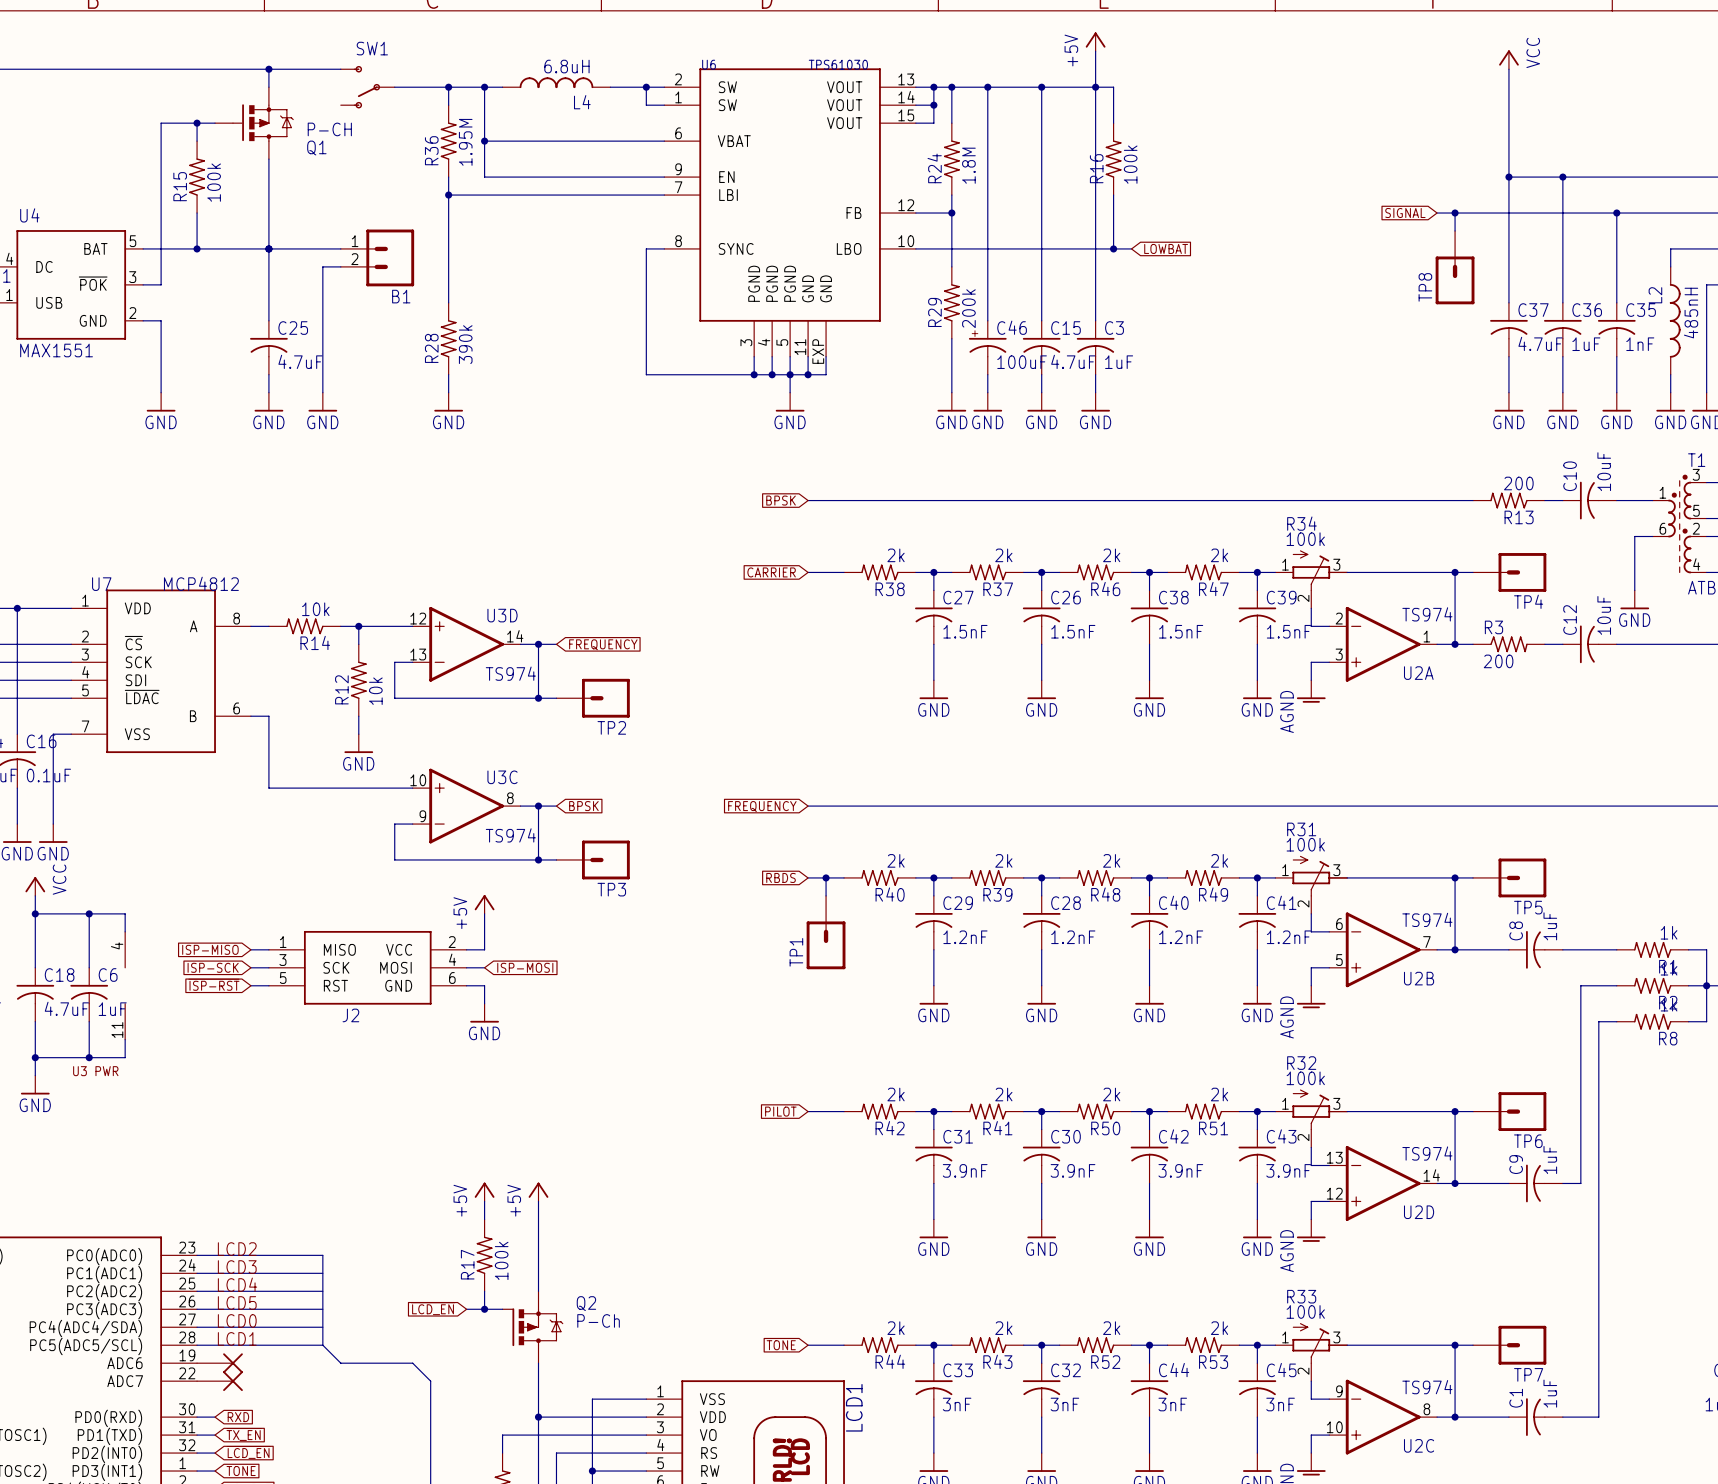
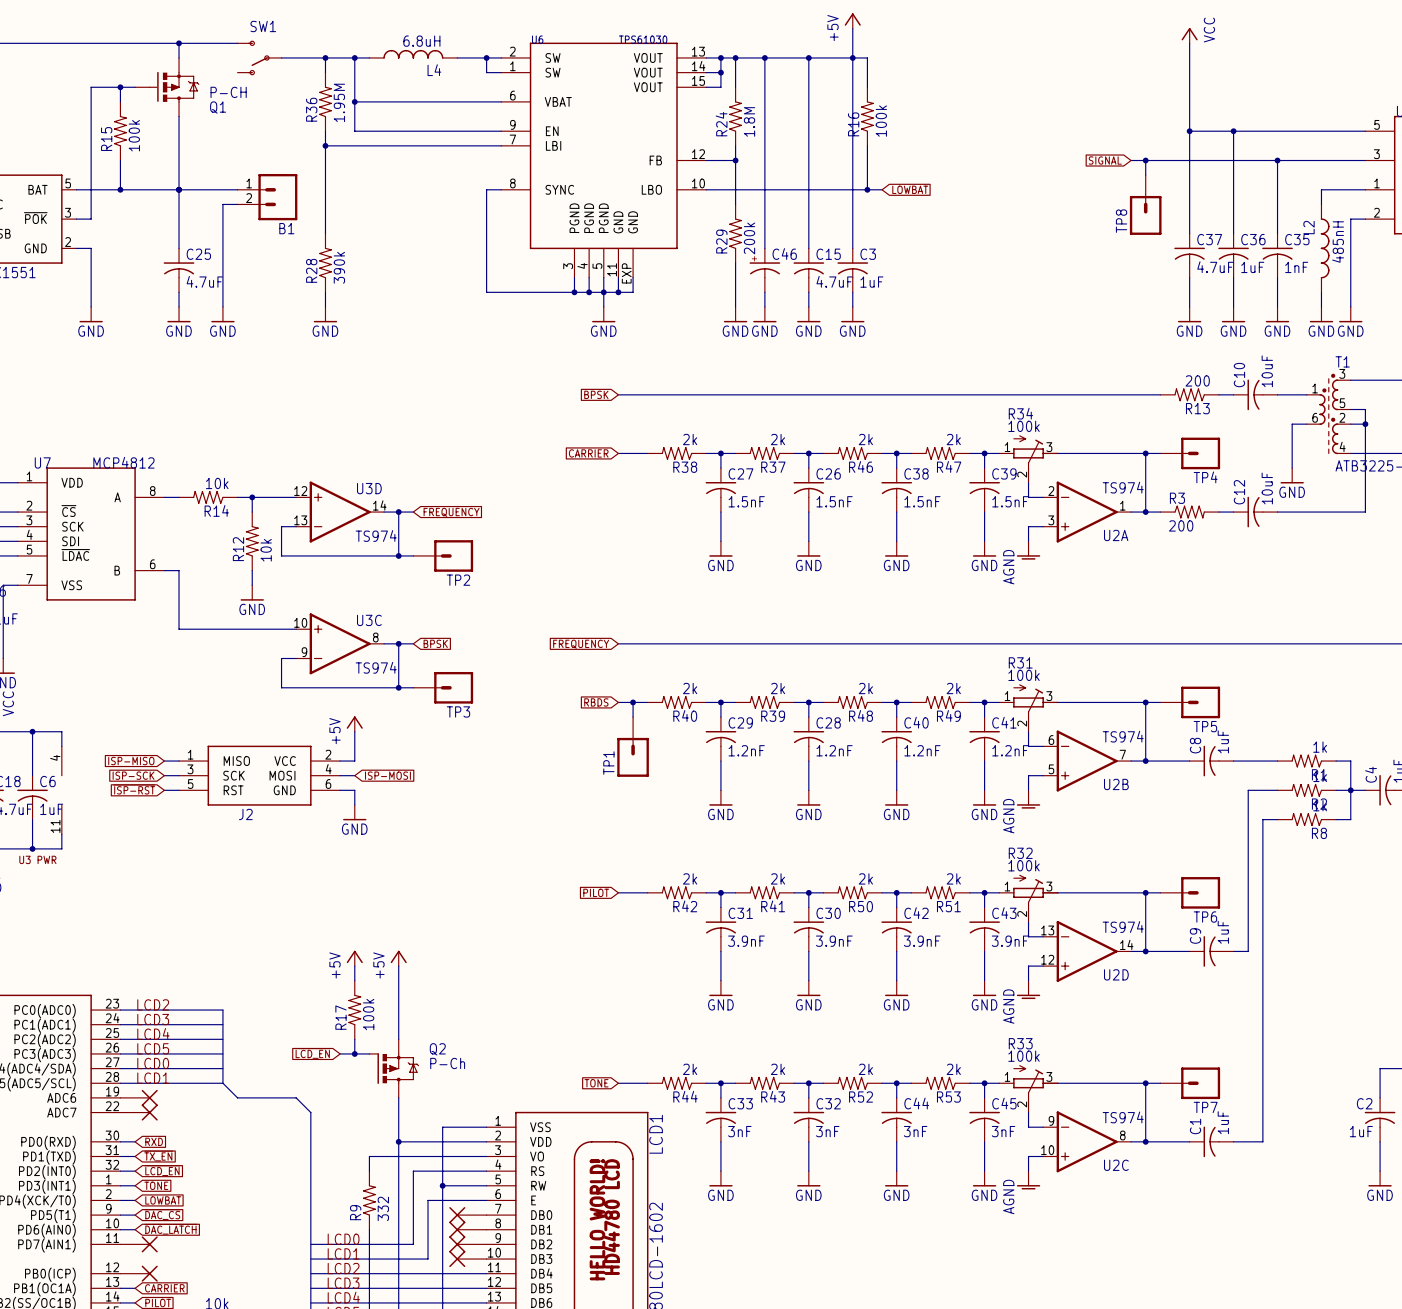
C46 value: 100uF (1022, 362) -> none

